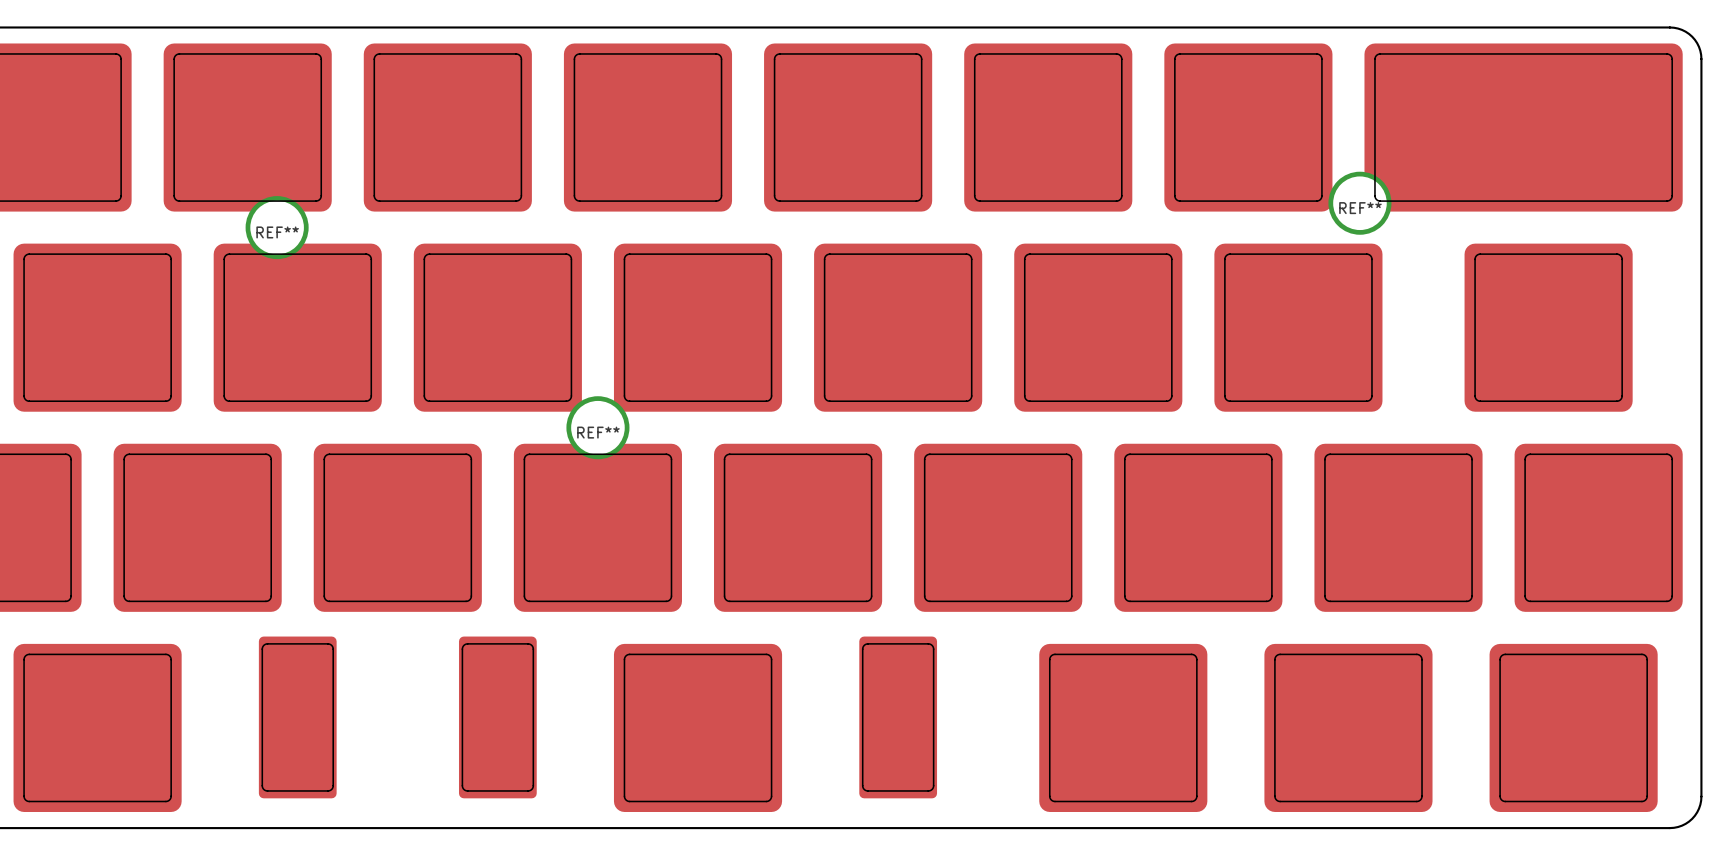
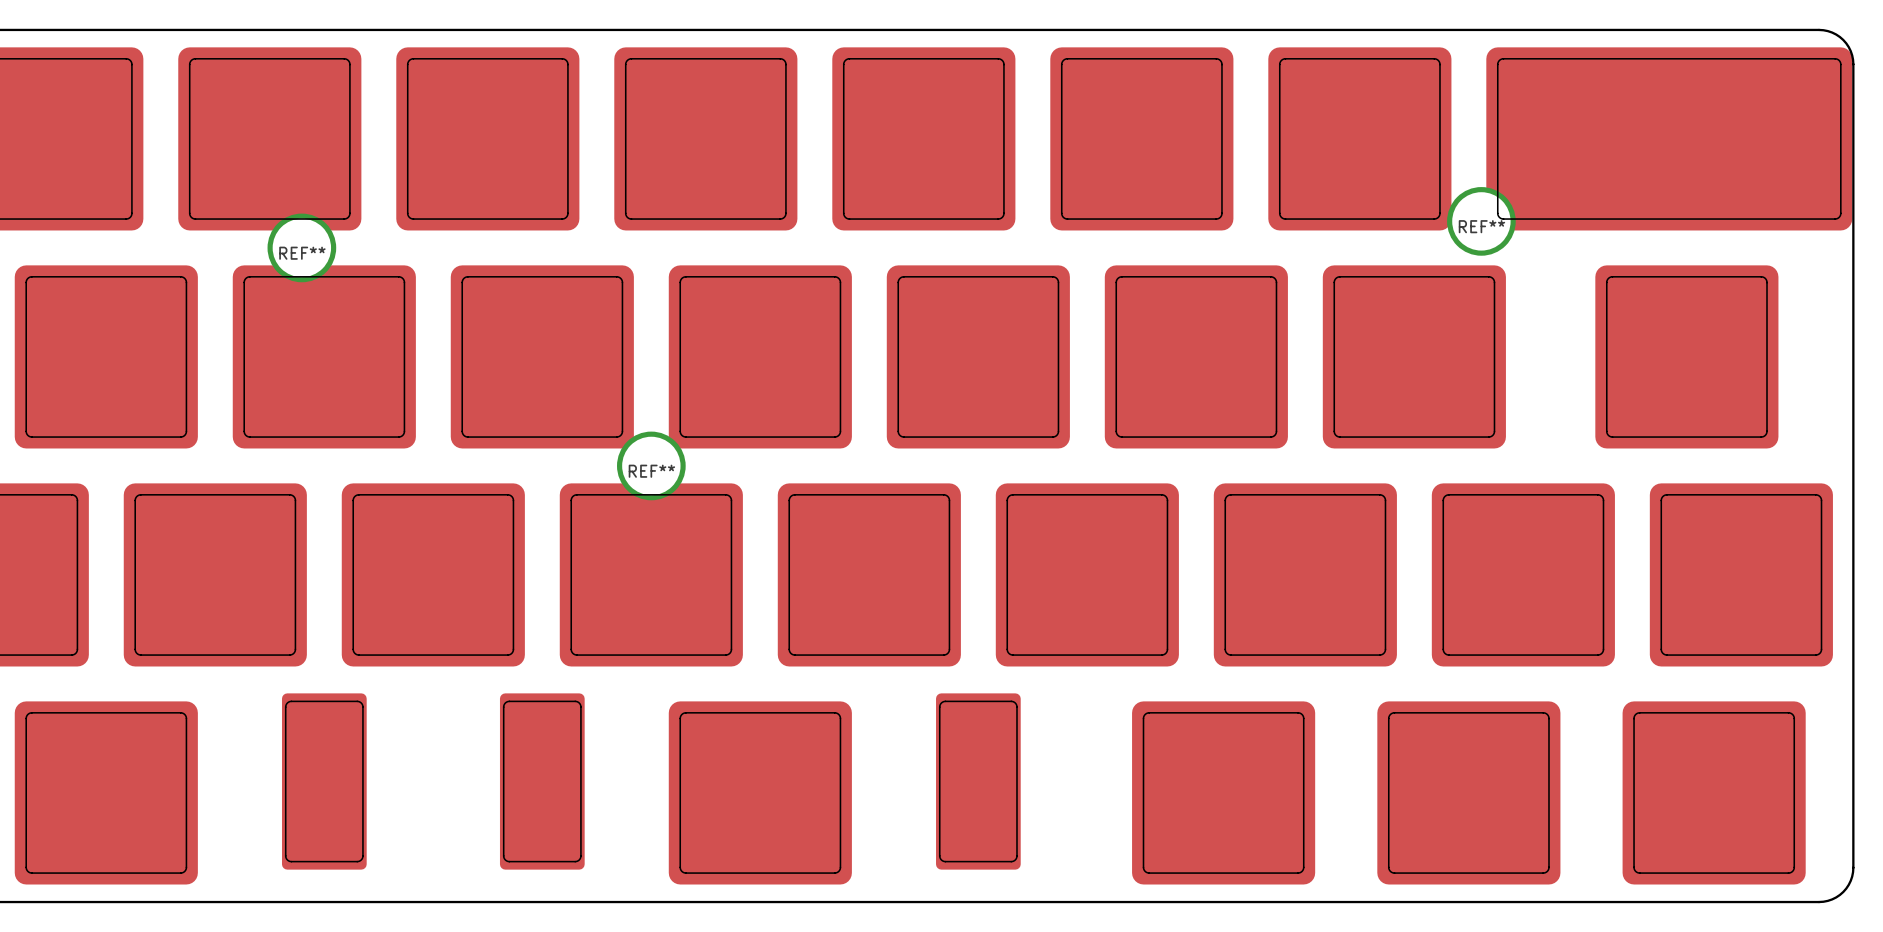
part footprint: [1364, 43, 1683, 212] -> [1486, 47, 1853, 231]

